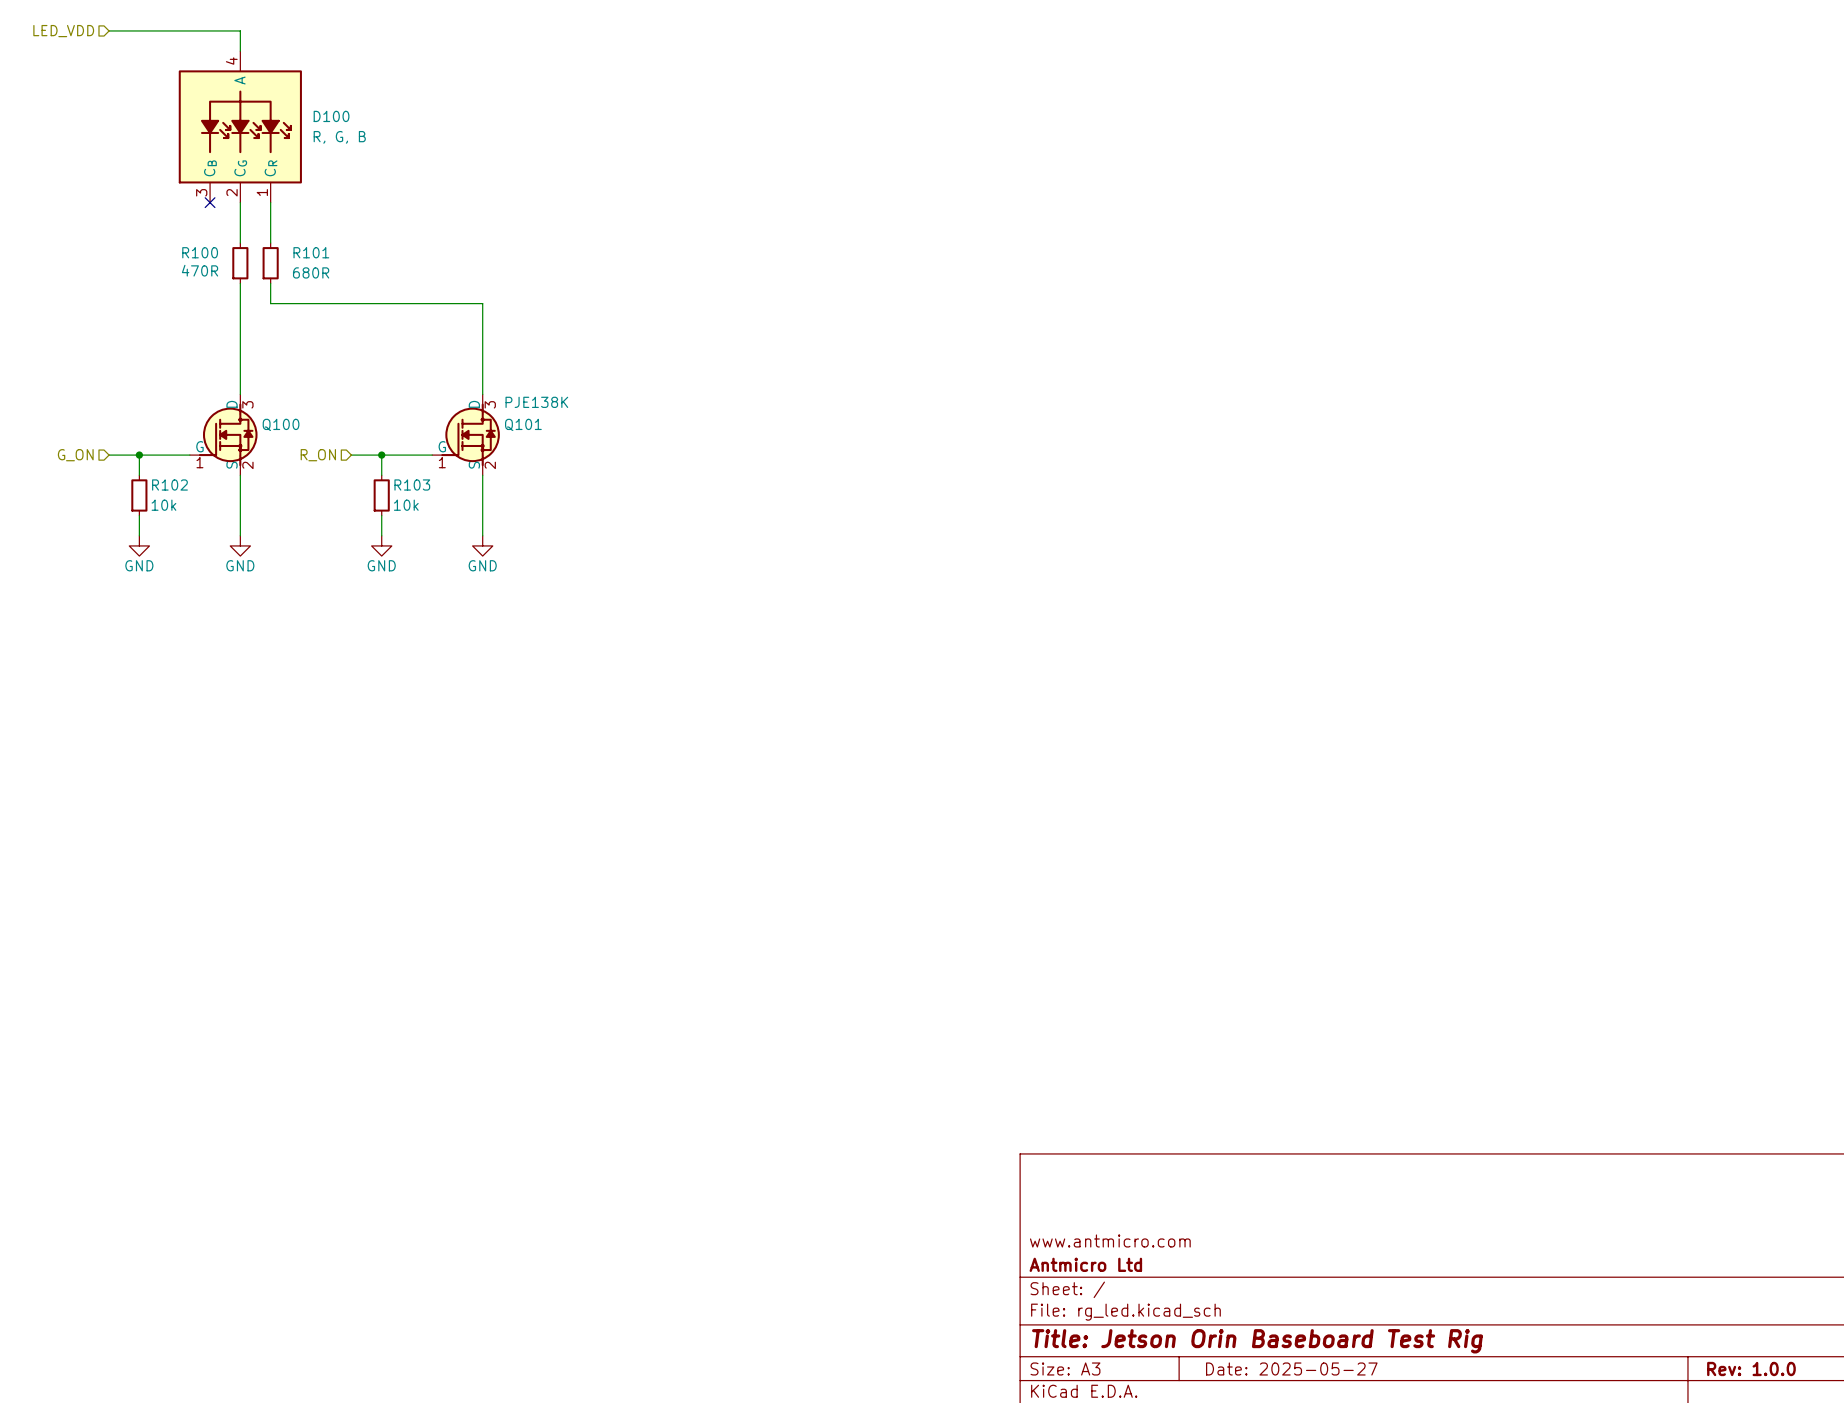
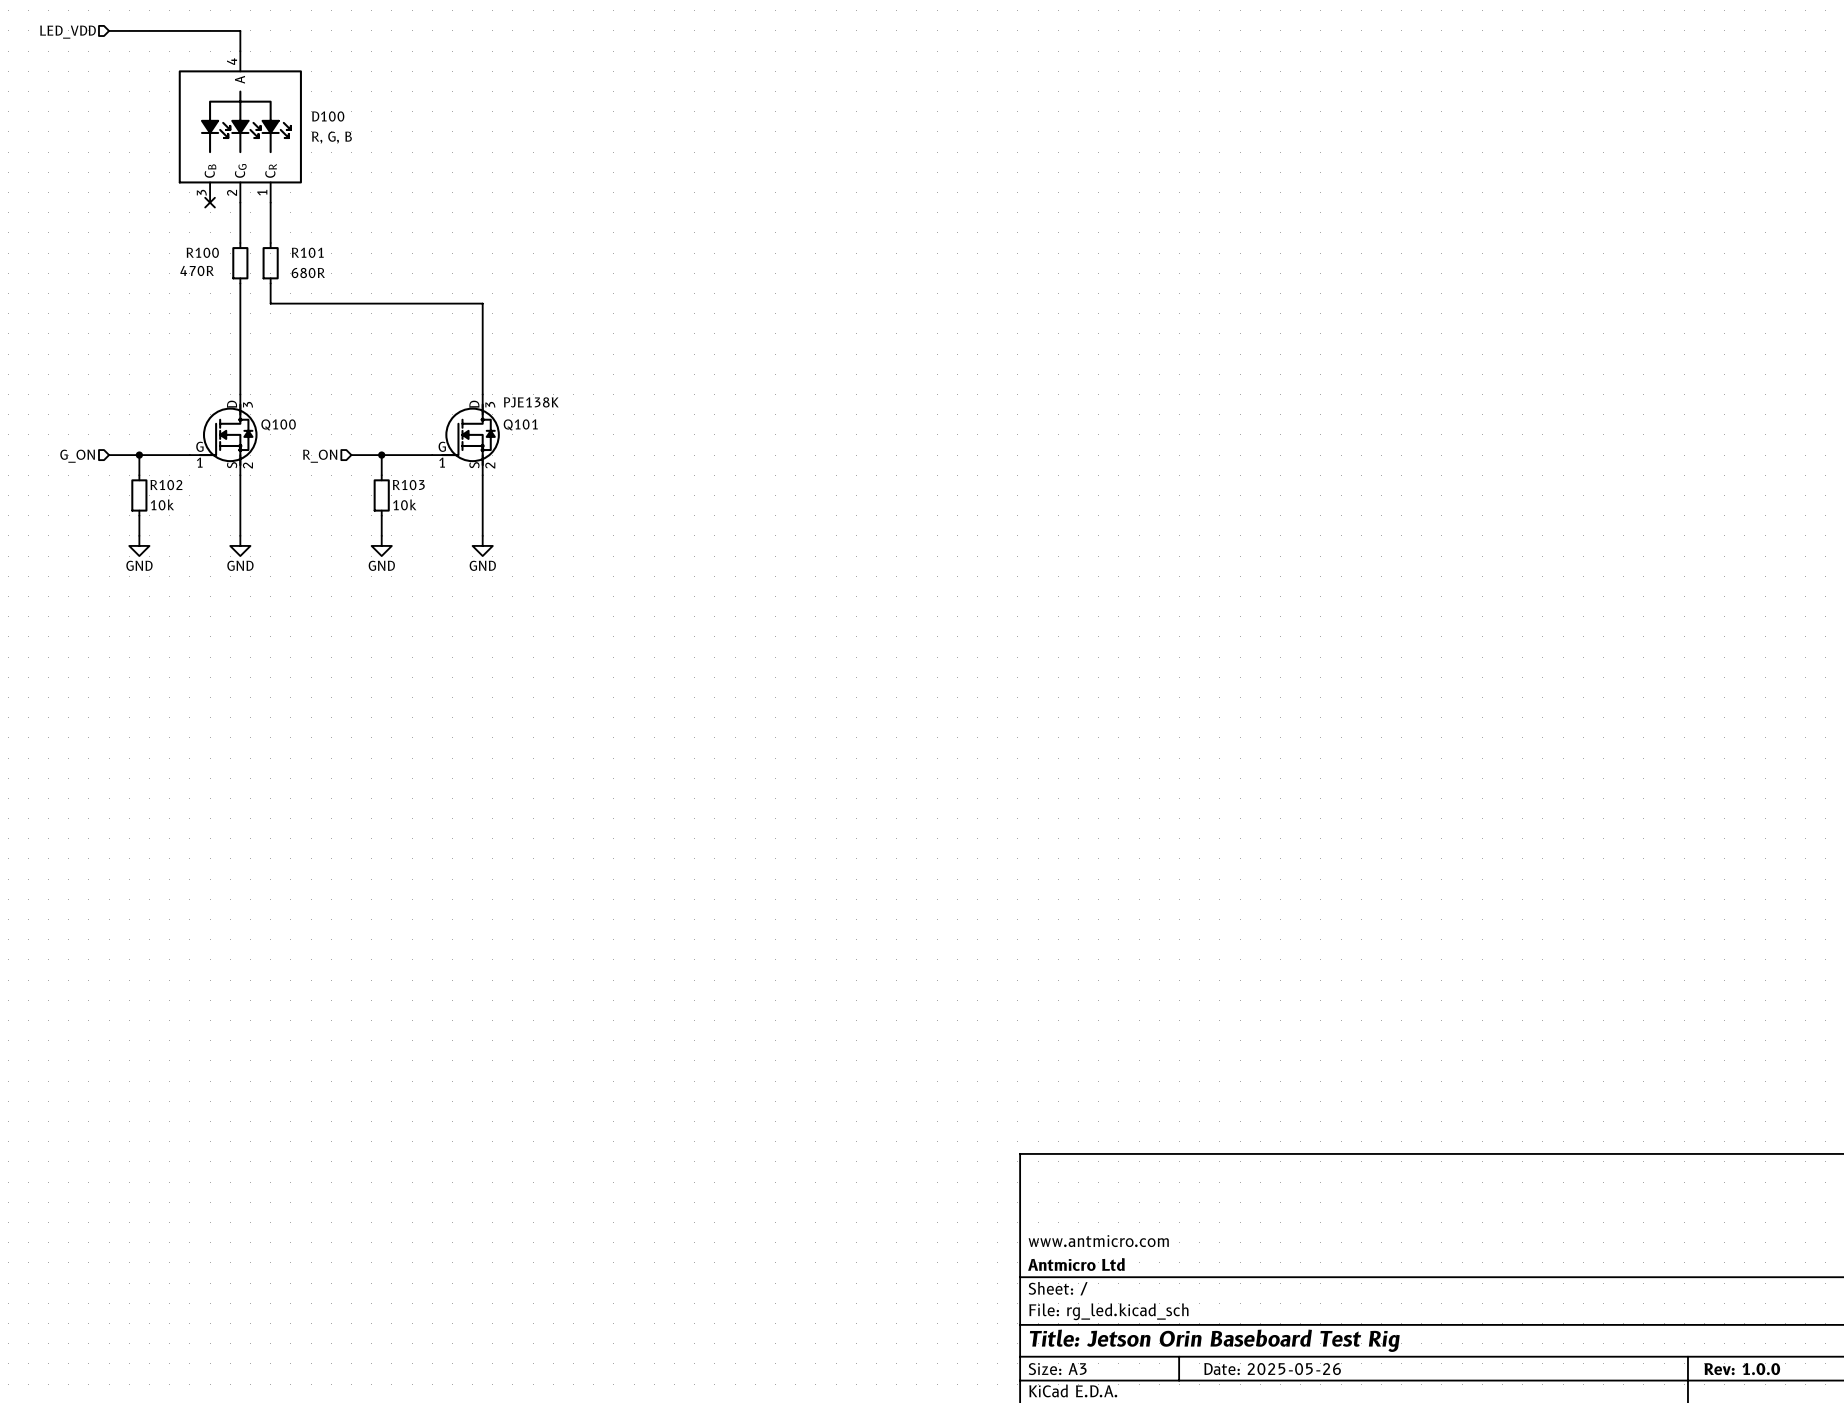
title block: Date: 2025-05-27 (1291, 1368) -> Date: 2025-05-26 (1272, 1369)

